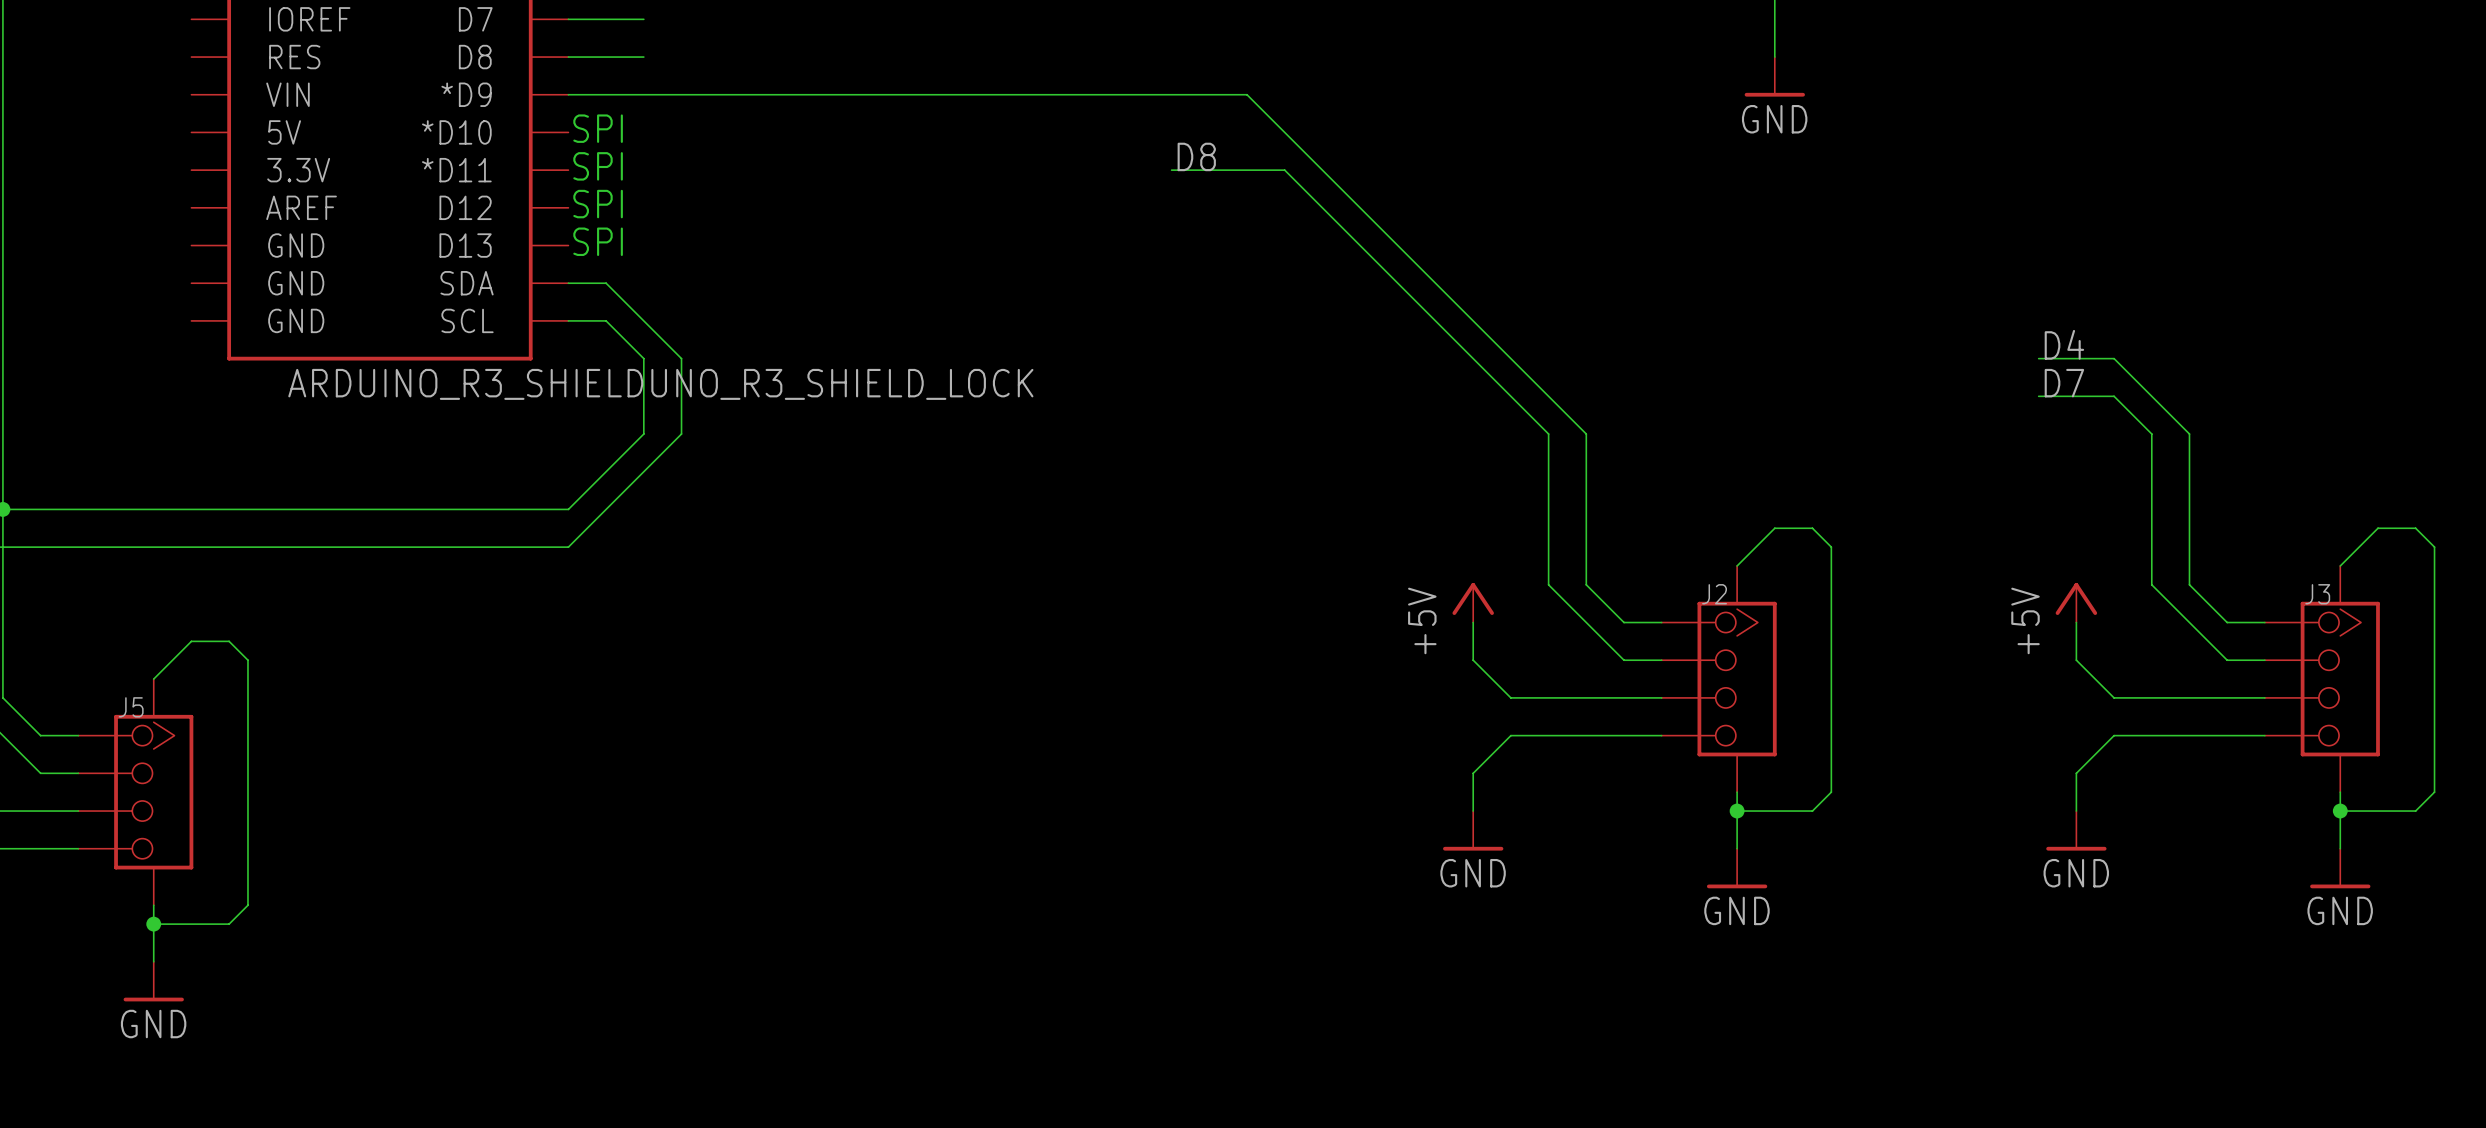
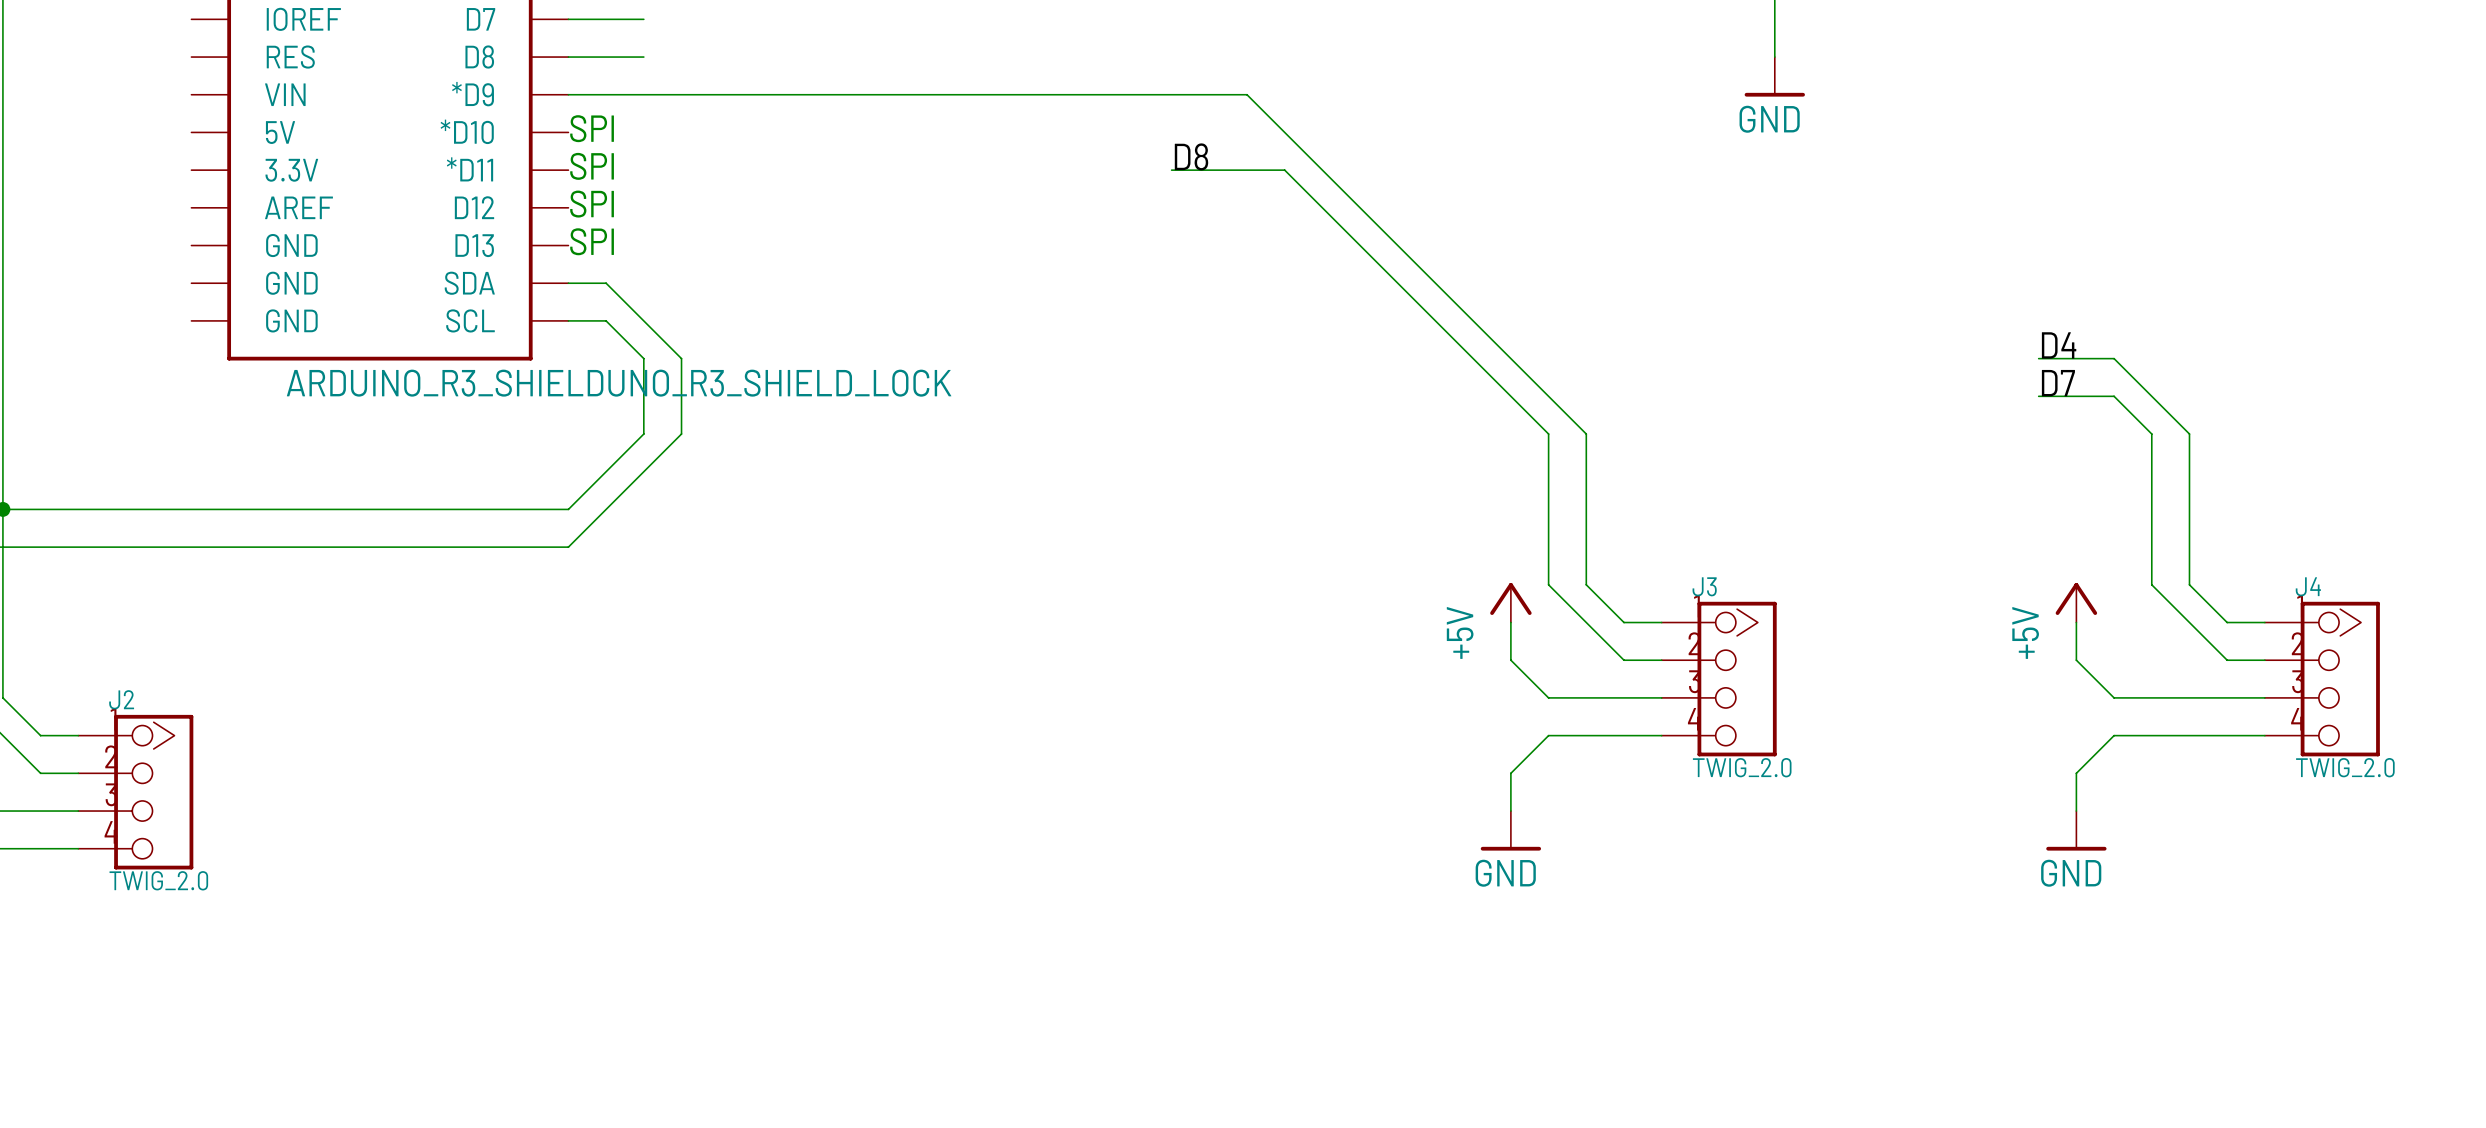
J2 symbol: [1661, 565, 1777, 793] -> [78, 714, 194, 870]
wire: (1737, 565) (1774, 528) (1812, 528) (1831, 547) (1831, 792) (1812, 811) (1737, 811) -> none
J3 symbol: [2264, 565, 2380, 793] -> [1661, 601, 1777, 757]
wire: (2340, 565) (2377, 528) (2415, 528) (2434, 547) (2434, 792) (2415, 811) (2340, 811) -> none
power symbol position: +5V (1473, 602) -> +5V (1510, 602)
wire: (1473, 622) (1473, 660) (1510, 697) (1548, 697) -> (1510, 622) (1510, 660) (1548, 697)
wire: (153, 679) (191, 641) (229, 641) (247, 660) (247, 905) (229, 924) (153, 924) -> none
J4: none -> TWIG_2.0 (2322, 679)
wire: (1548, 735) (1510, 735) (1473, 773) (1473, 811) -> (1548, 735) (1510, 773) (1510, 811)
J3 value: none -> TWIG_2.0 (1742, 767)
J5: (135, 792) -> none
wire: (1737, 792) (1737, 848) -> none
wire: (2340, 792) (2340, 848) -> none
junction: (1737, 811) -> none
junction: (2340, 811) -> none
power symbol position: GND (1473, 830) -> GND (1510, 830)
power symbol: GND (1737, 868) -> none
power symbol: GND (2340, 868) -> none
J2 value: none -> TWIG_2.0 (158, 880)
wire: (153, 905) (153, 961) -> none
junction: (153, 924) -> none
power symbol: GND (153, 981) -> none

